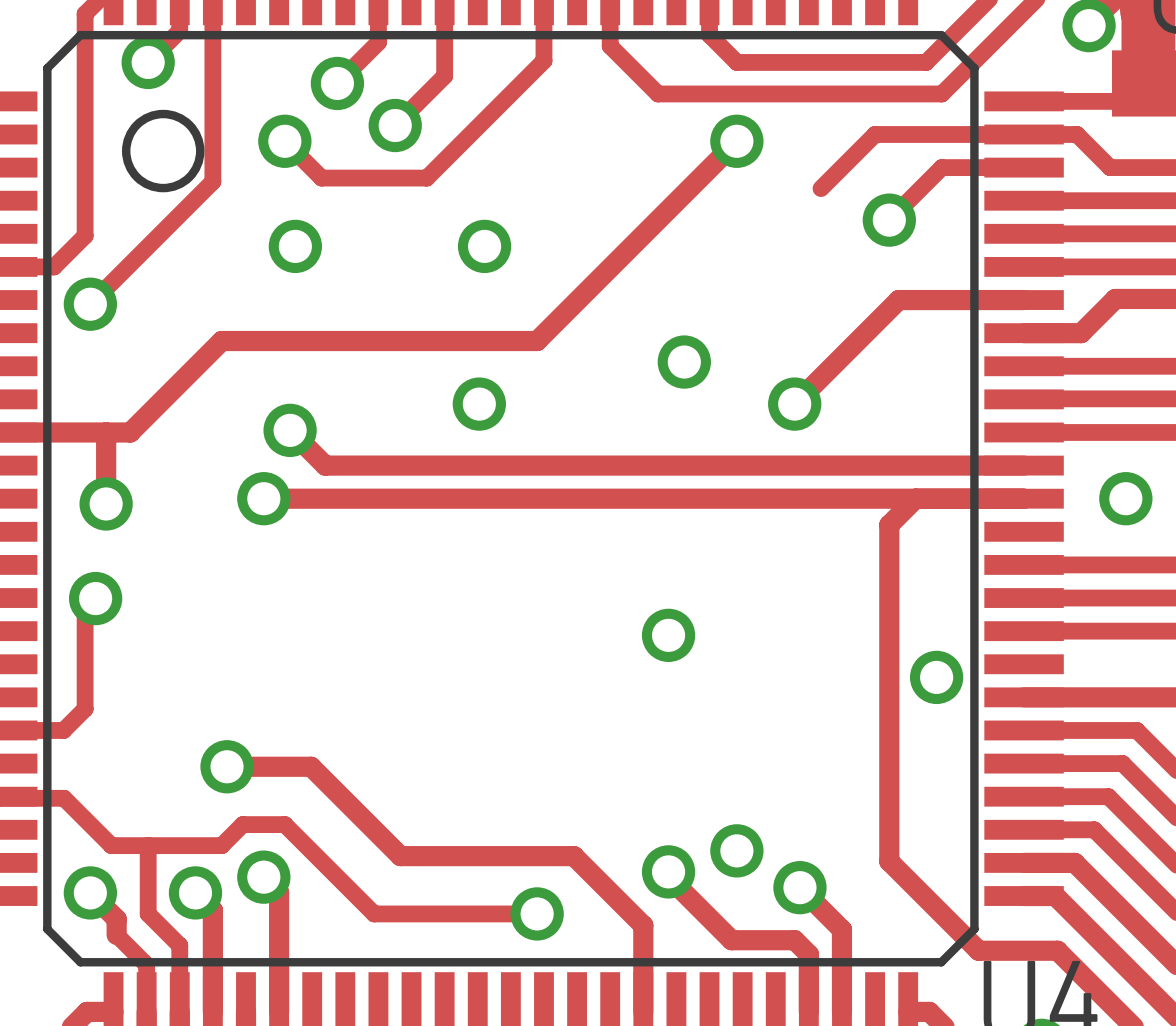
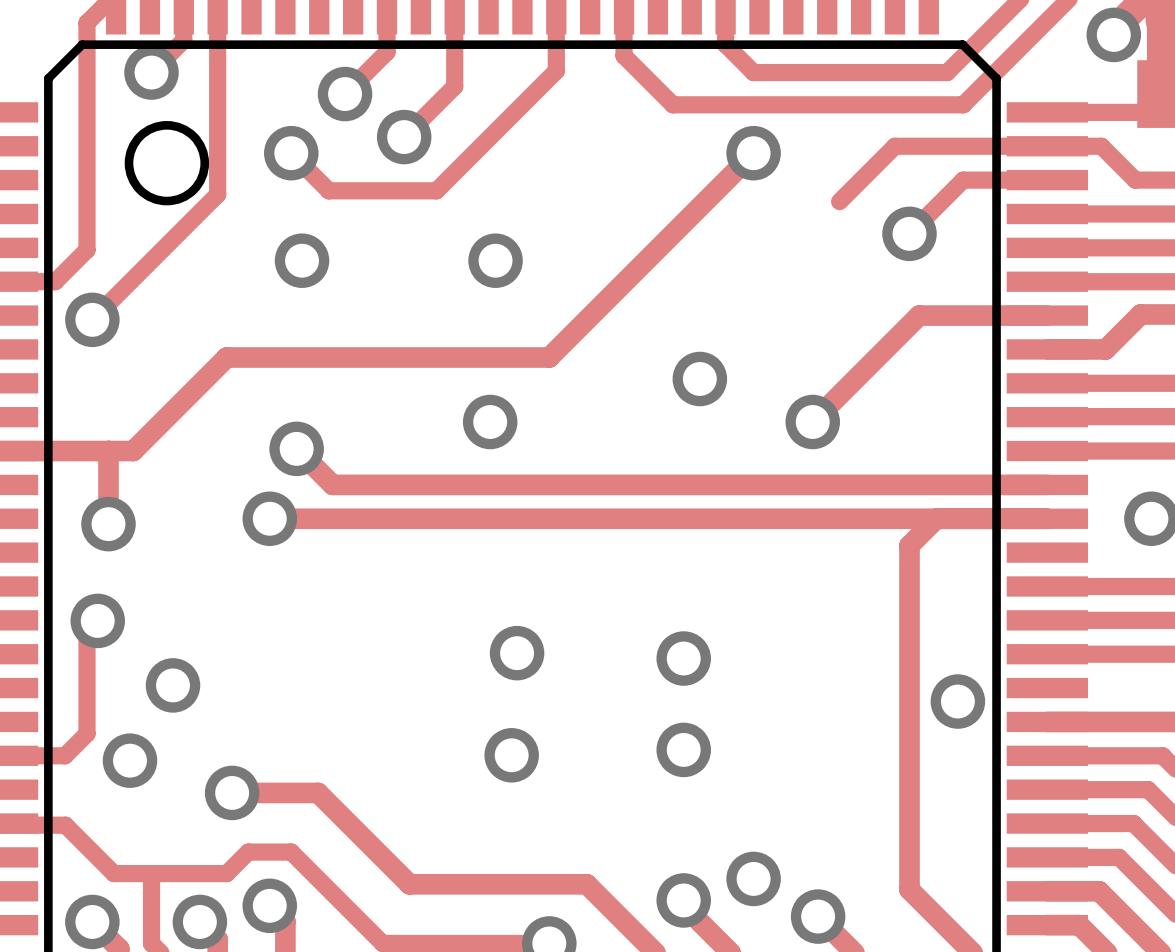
via: none -> (517, 653)
via: none -> (173, 685)
via: none -> (683, 749)
via: none -> (511, 755)
via: none -> (130, 760)

